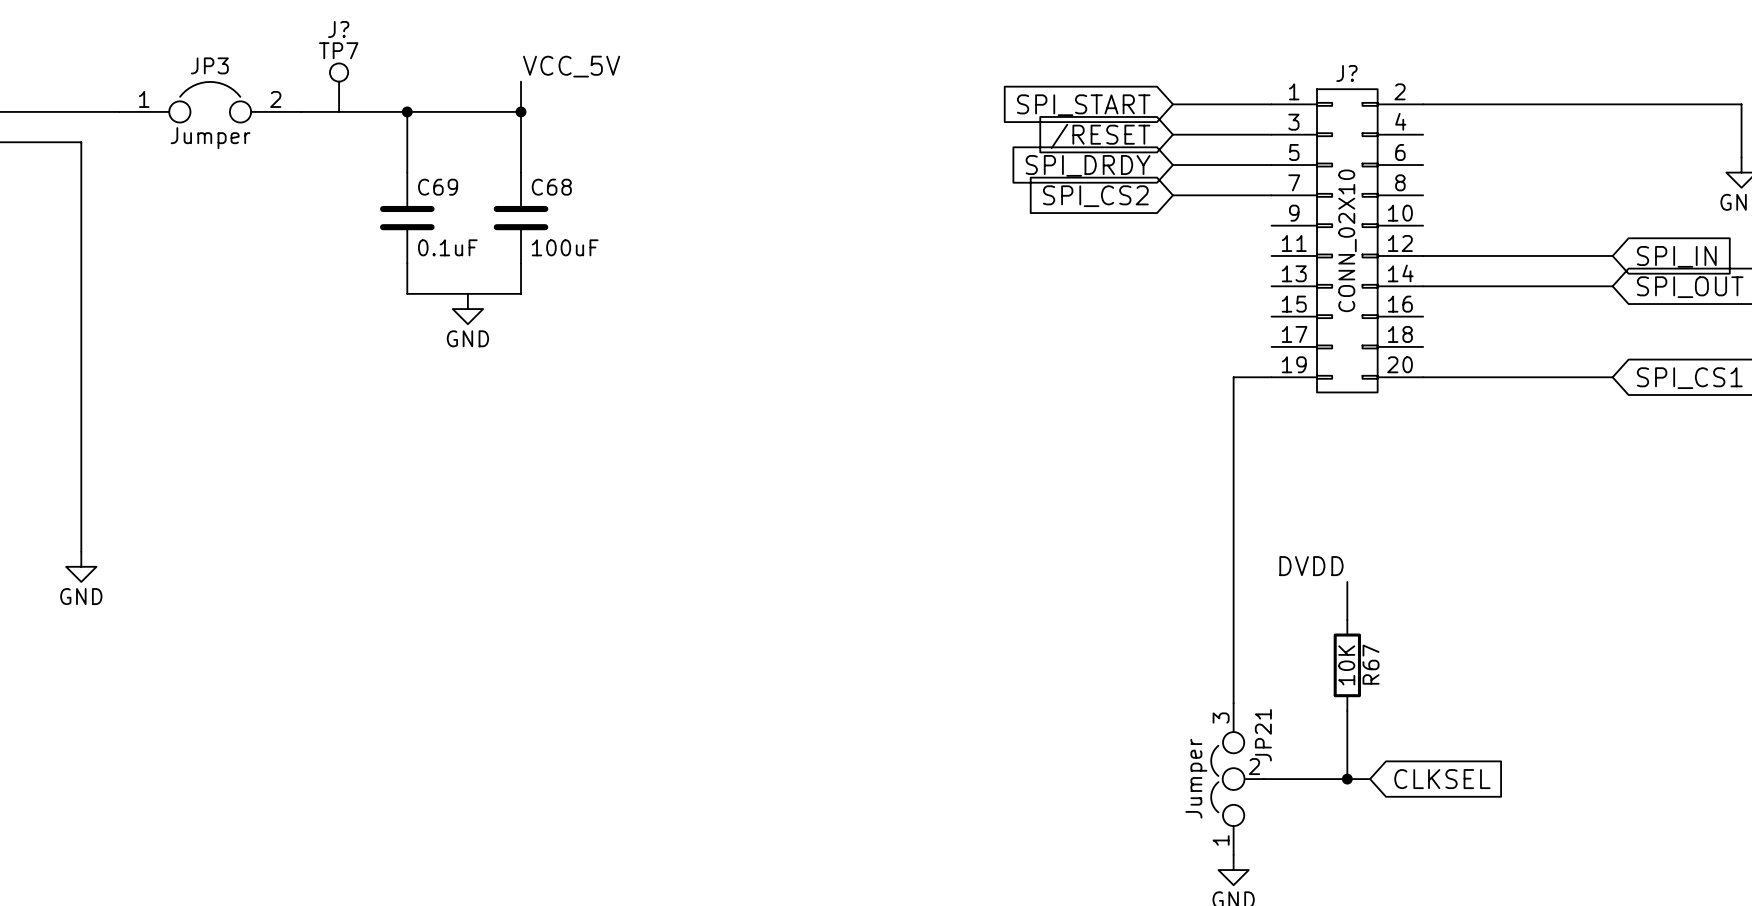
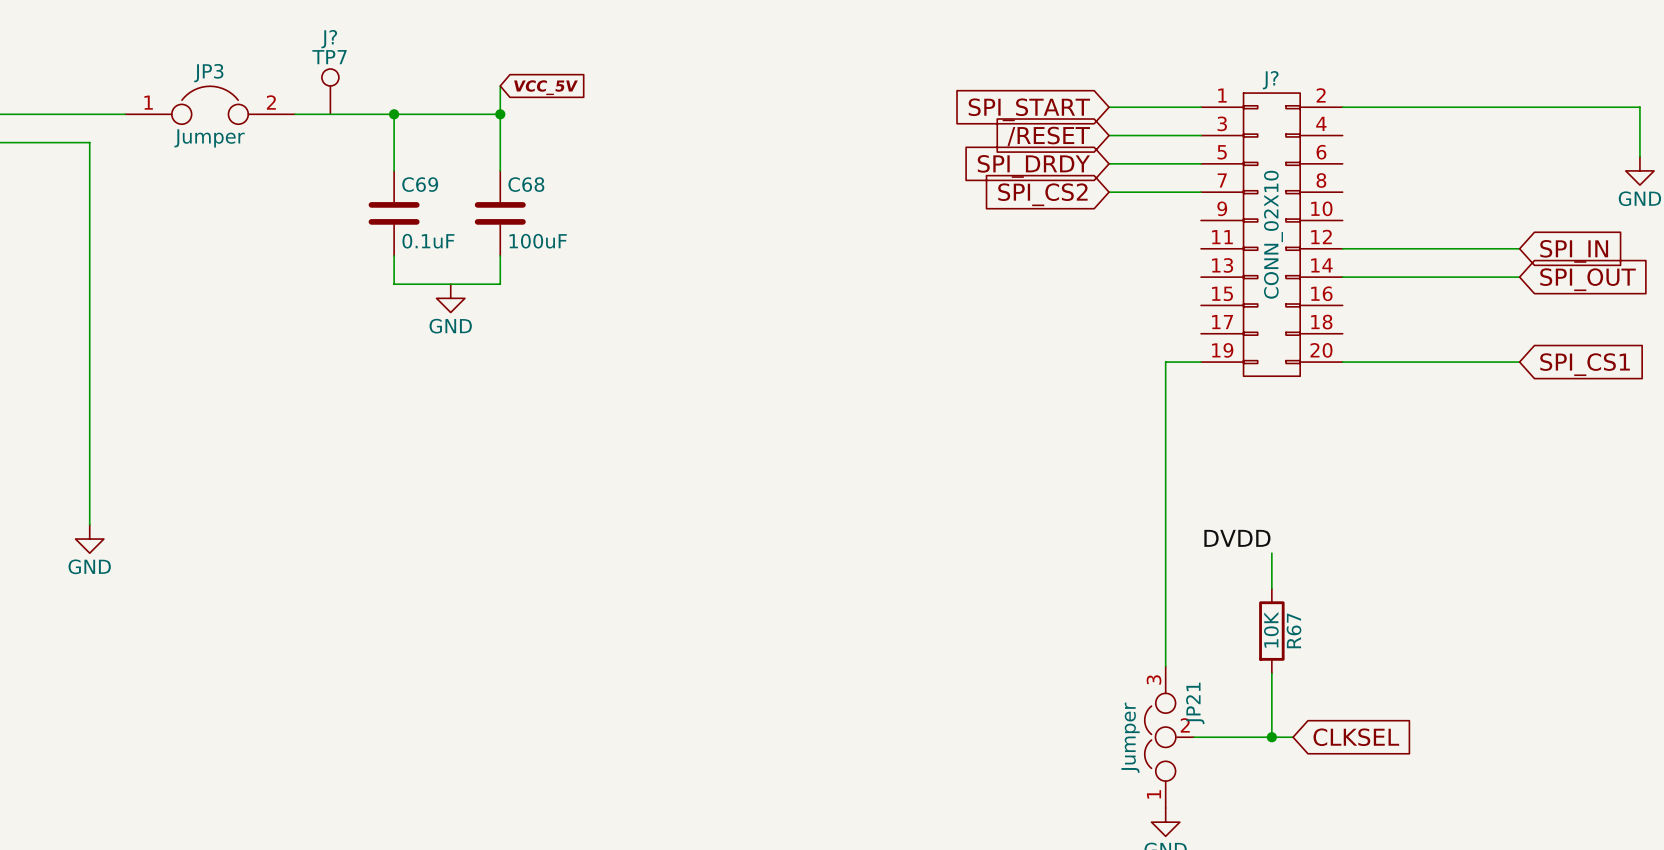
label: VCC_5V (571, 66) -> none
global label: none -> VCC_5V (545, 87)

